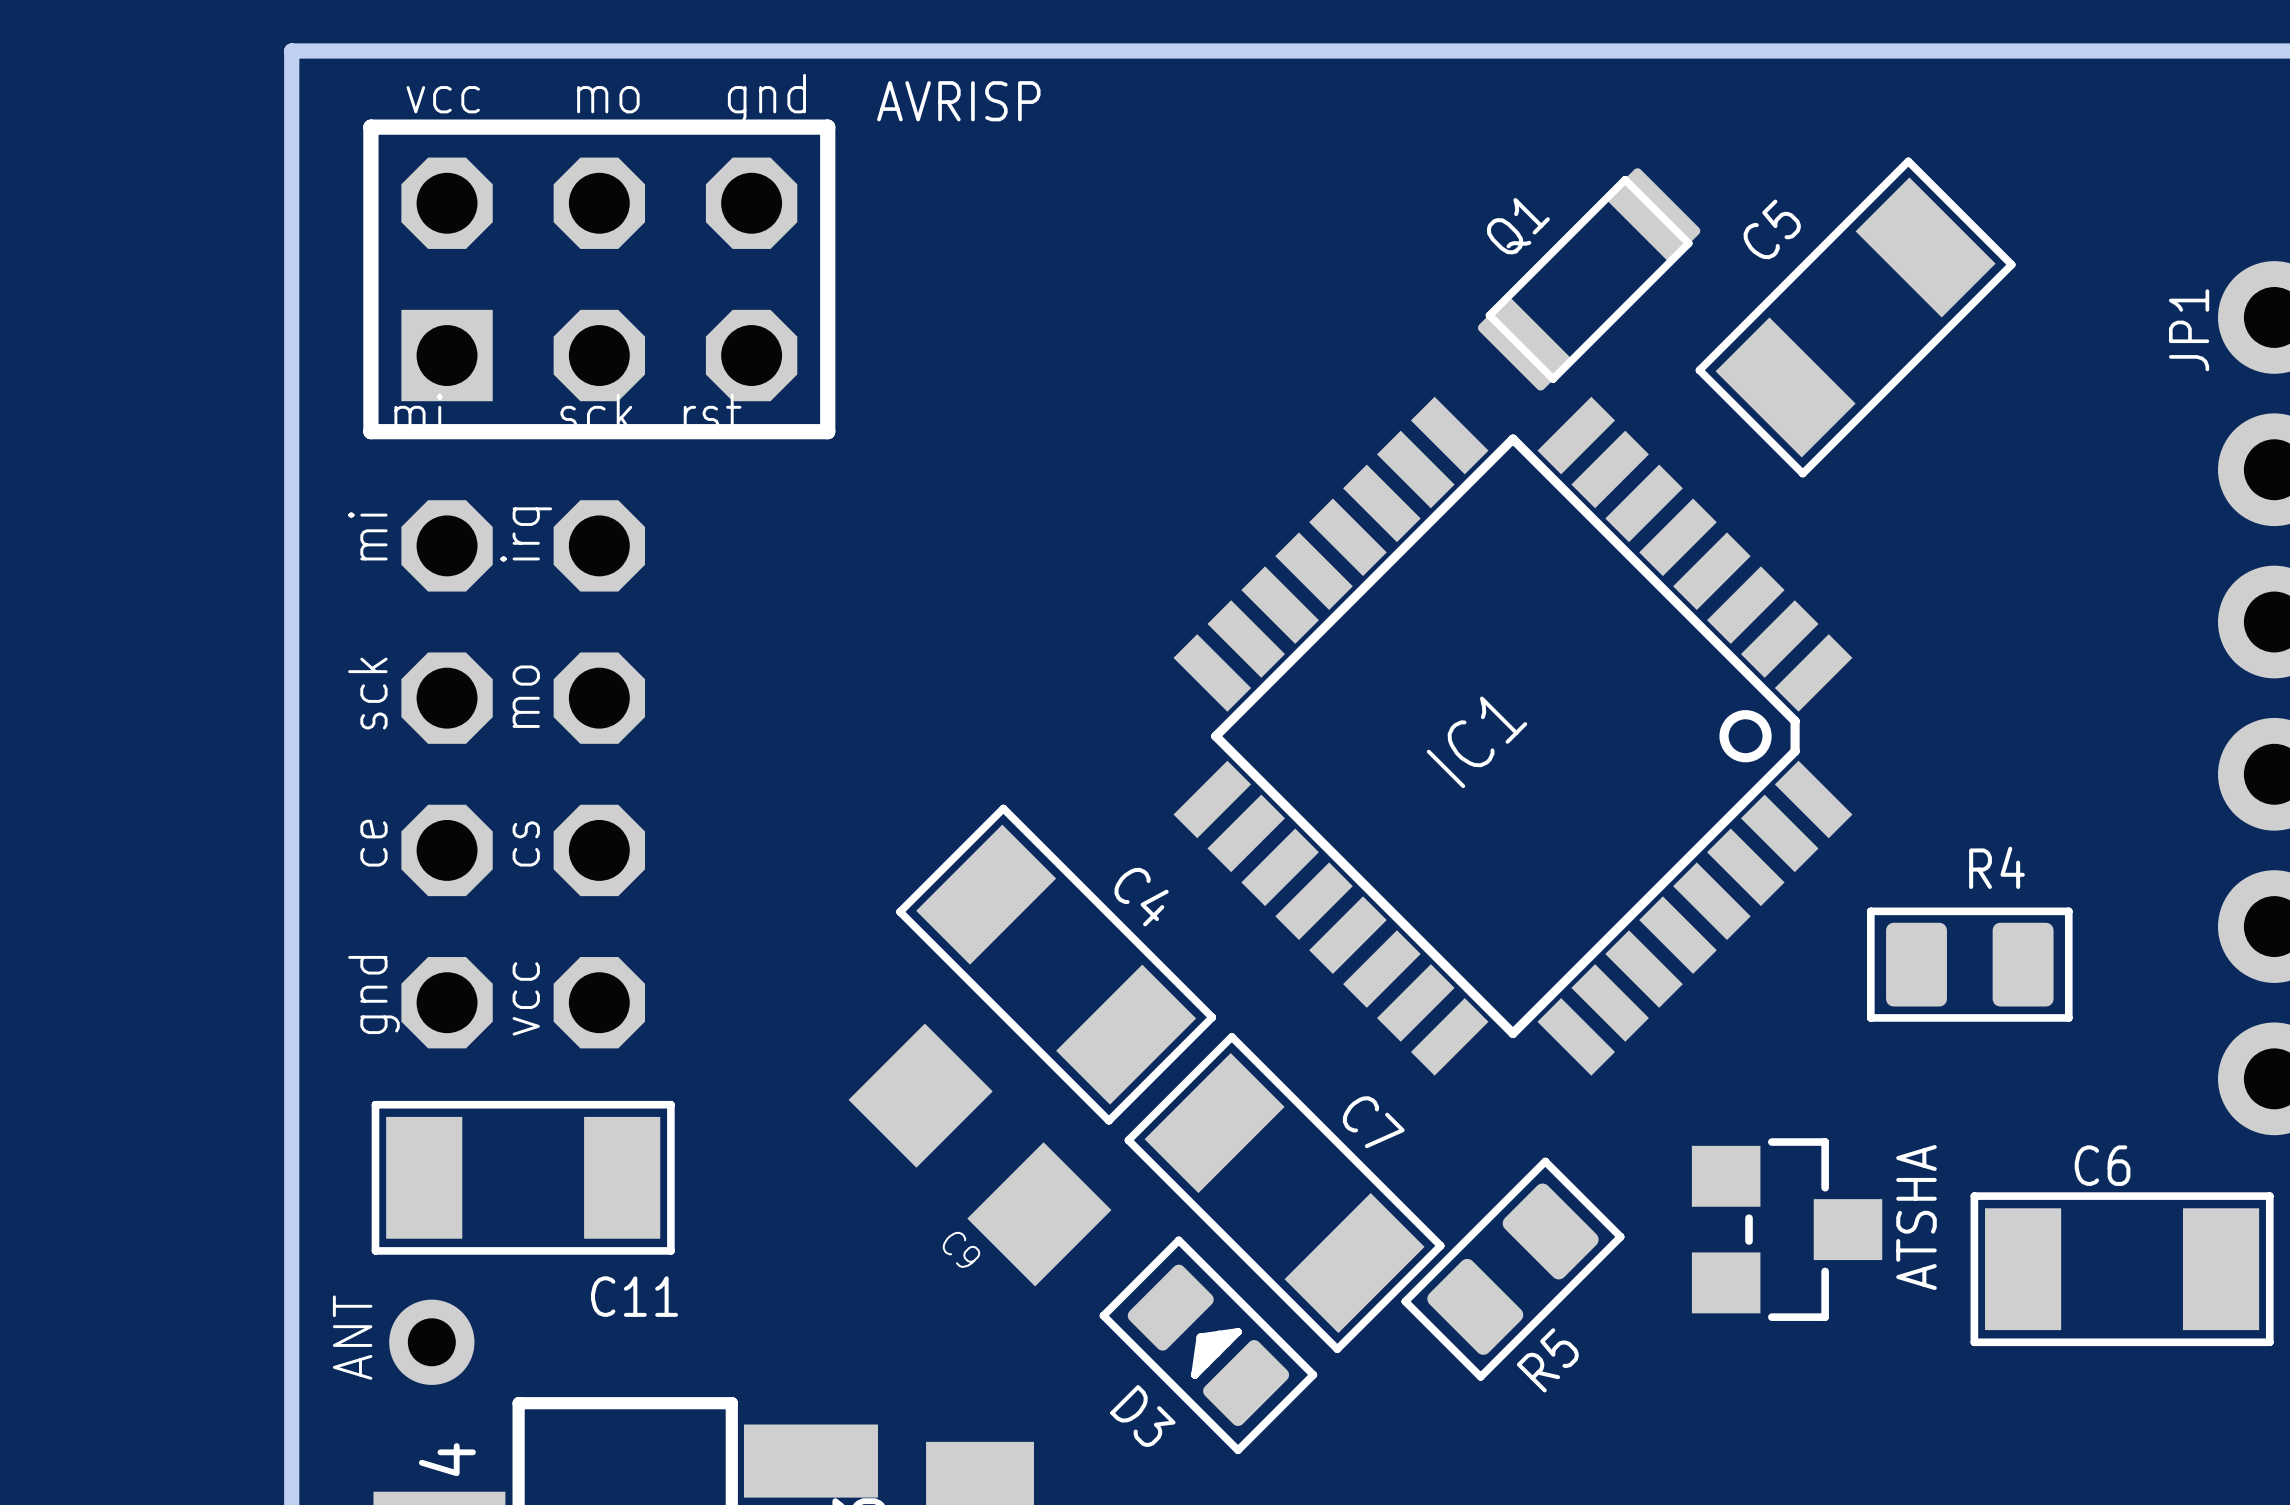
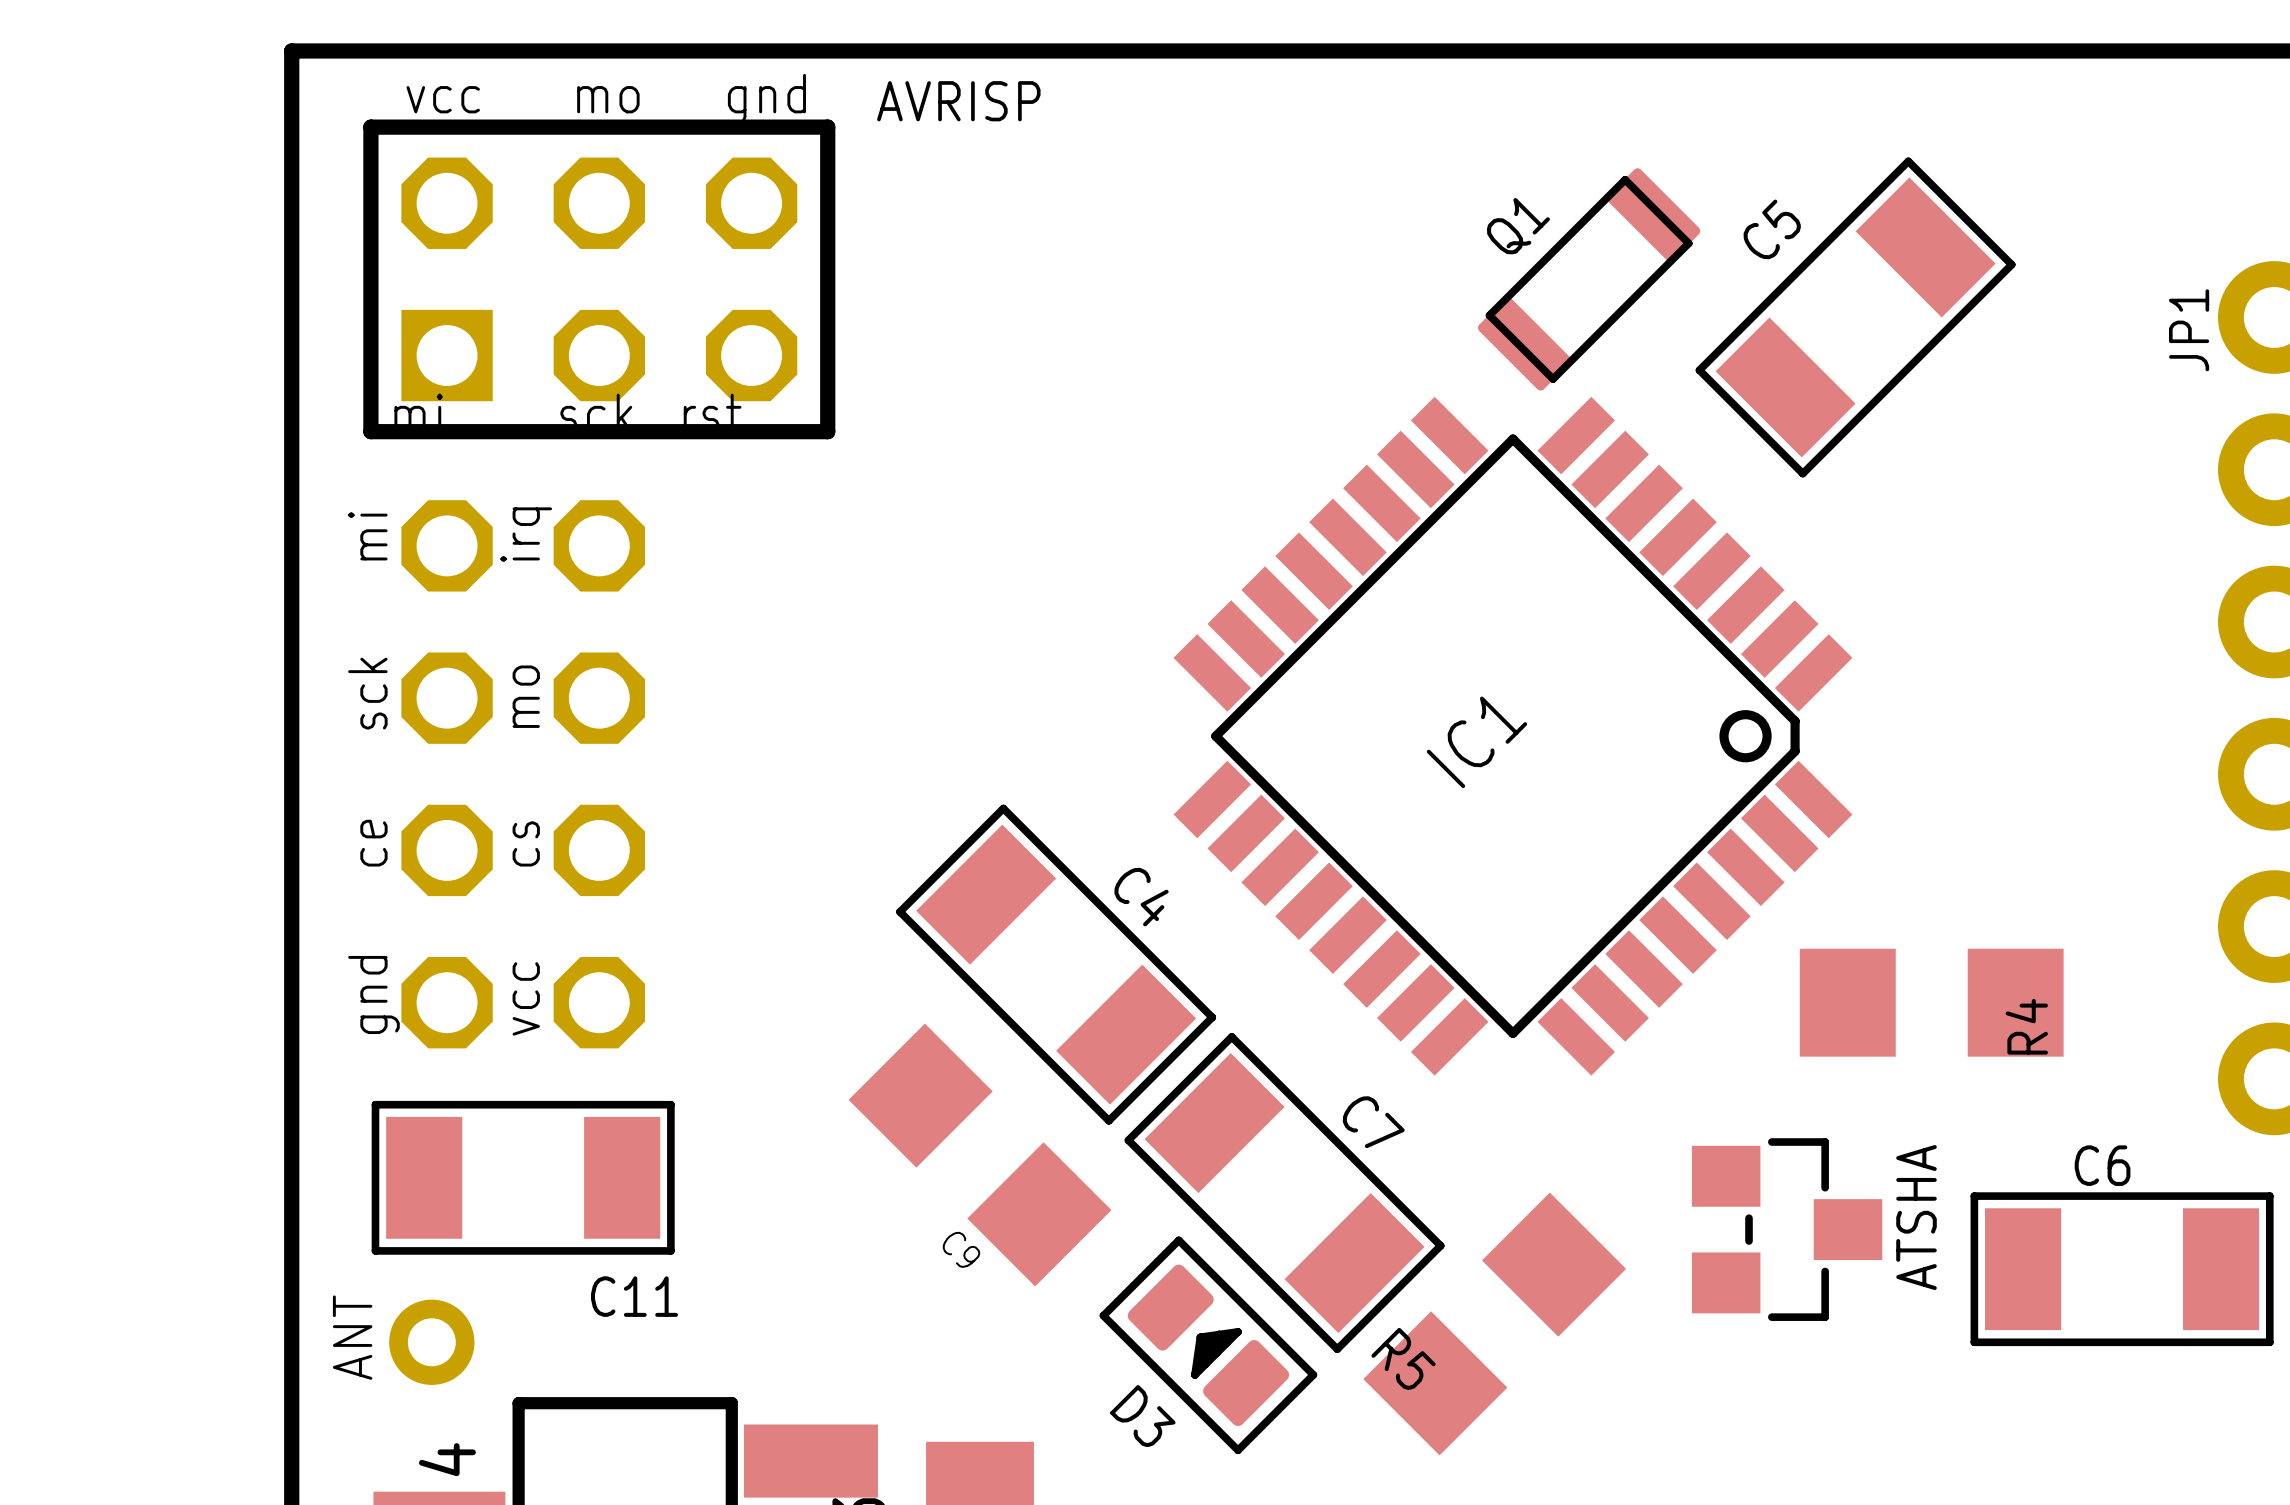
R4 name position: R4 (1996, 867) -> R4 (2026, 1026)
R4 footprint: [1867, 907, 2073, 1022] -> [1799, 948, 2064, 1057]
R5 footprint: [1401, 1157, 1625, 1381] -> [1363, 1192, 1627, 1456]
R5 name position: R5 (1547, 1360) -> R5 (1403, 1358)

